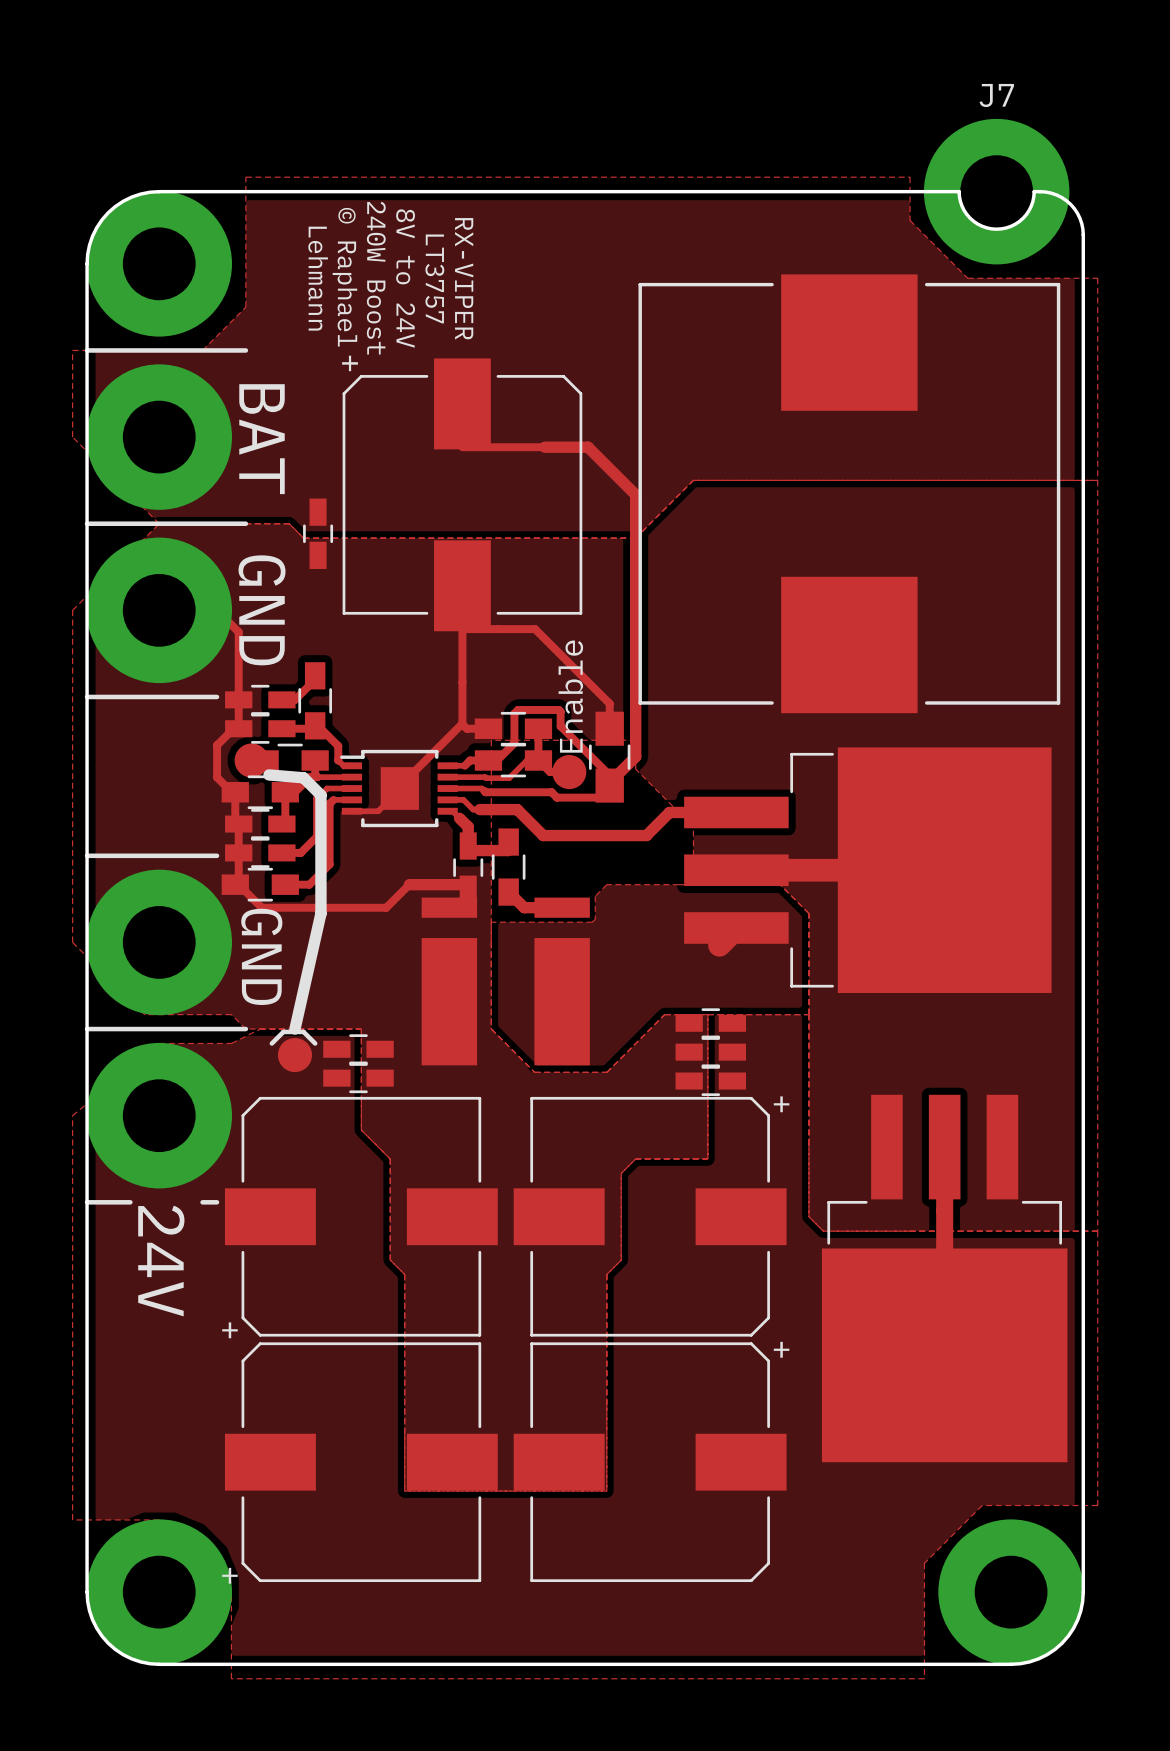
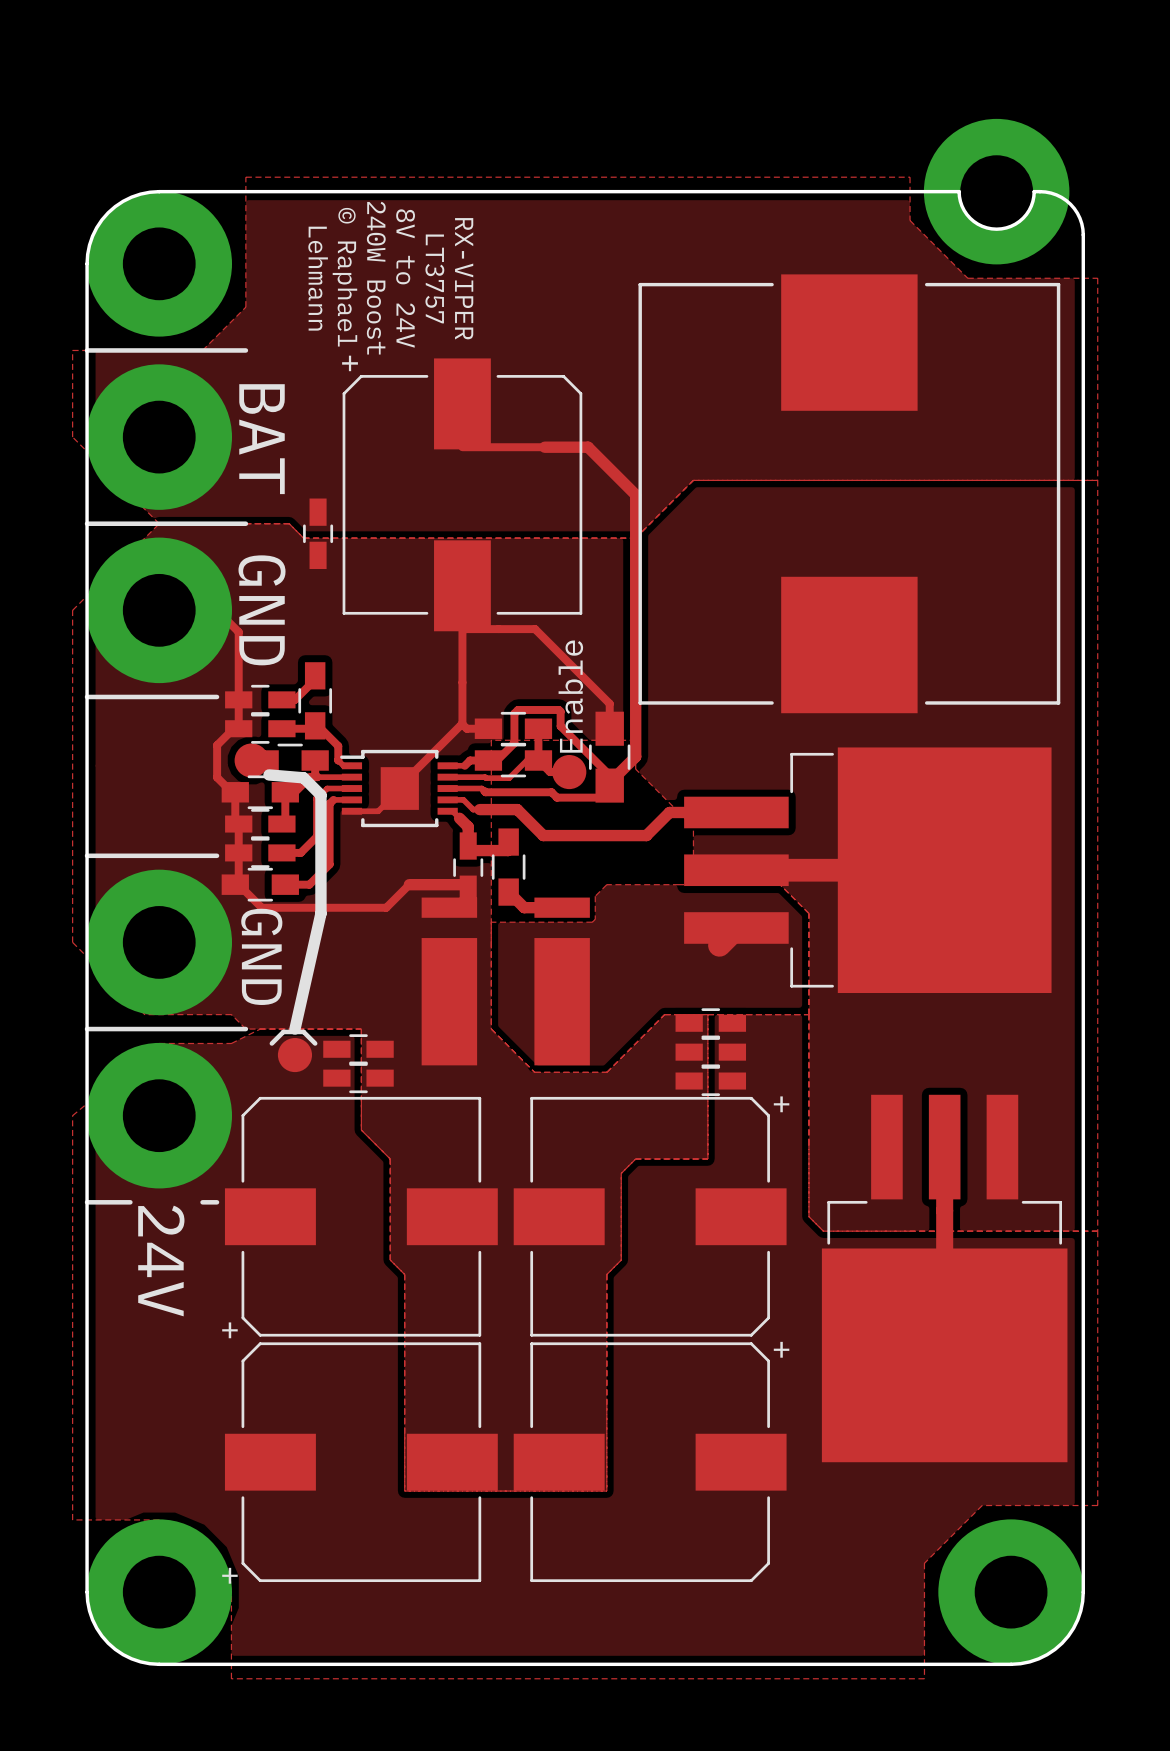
J7 name: J7 (996, 95) -> none

